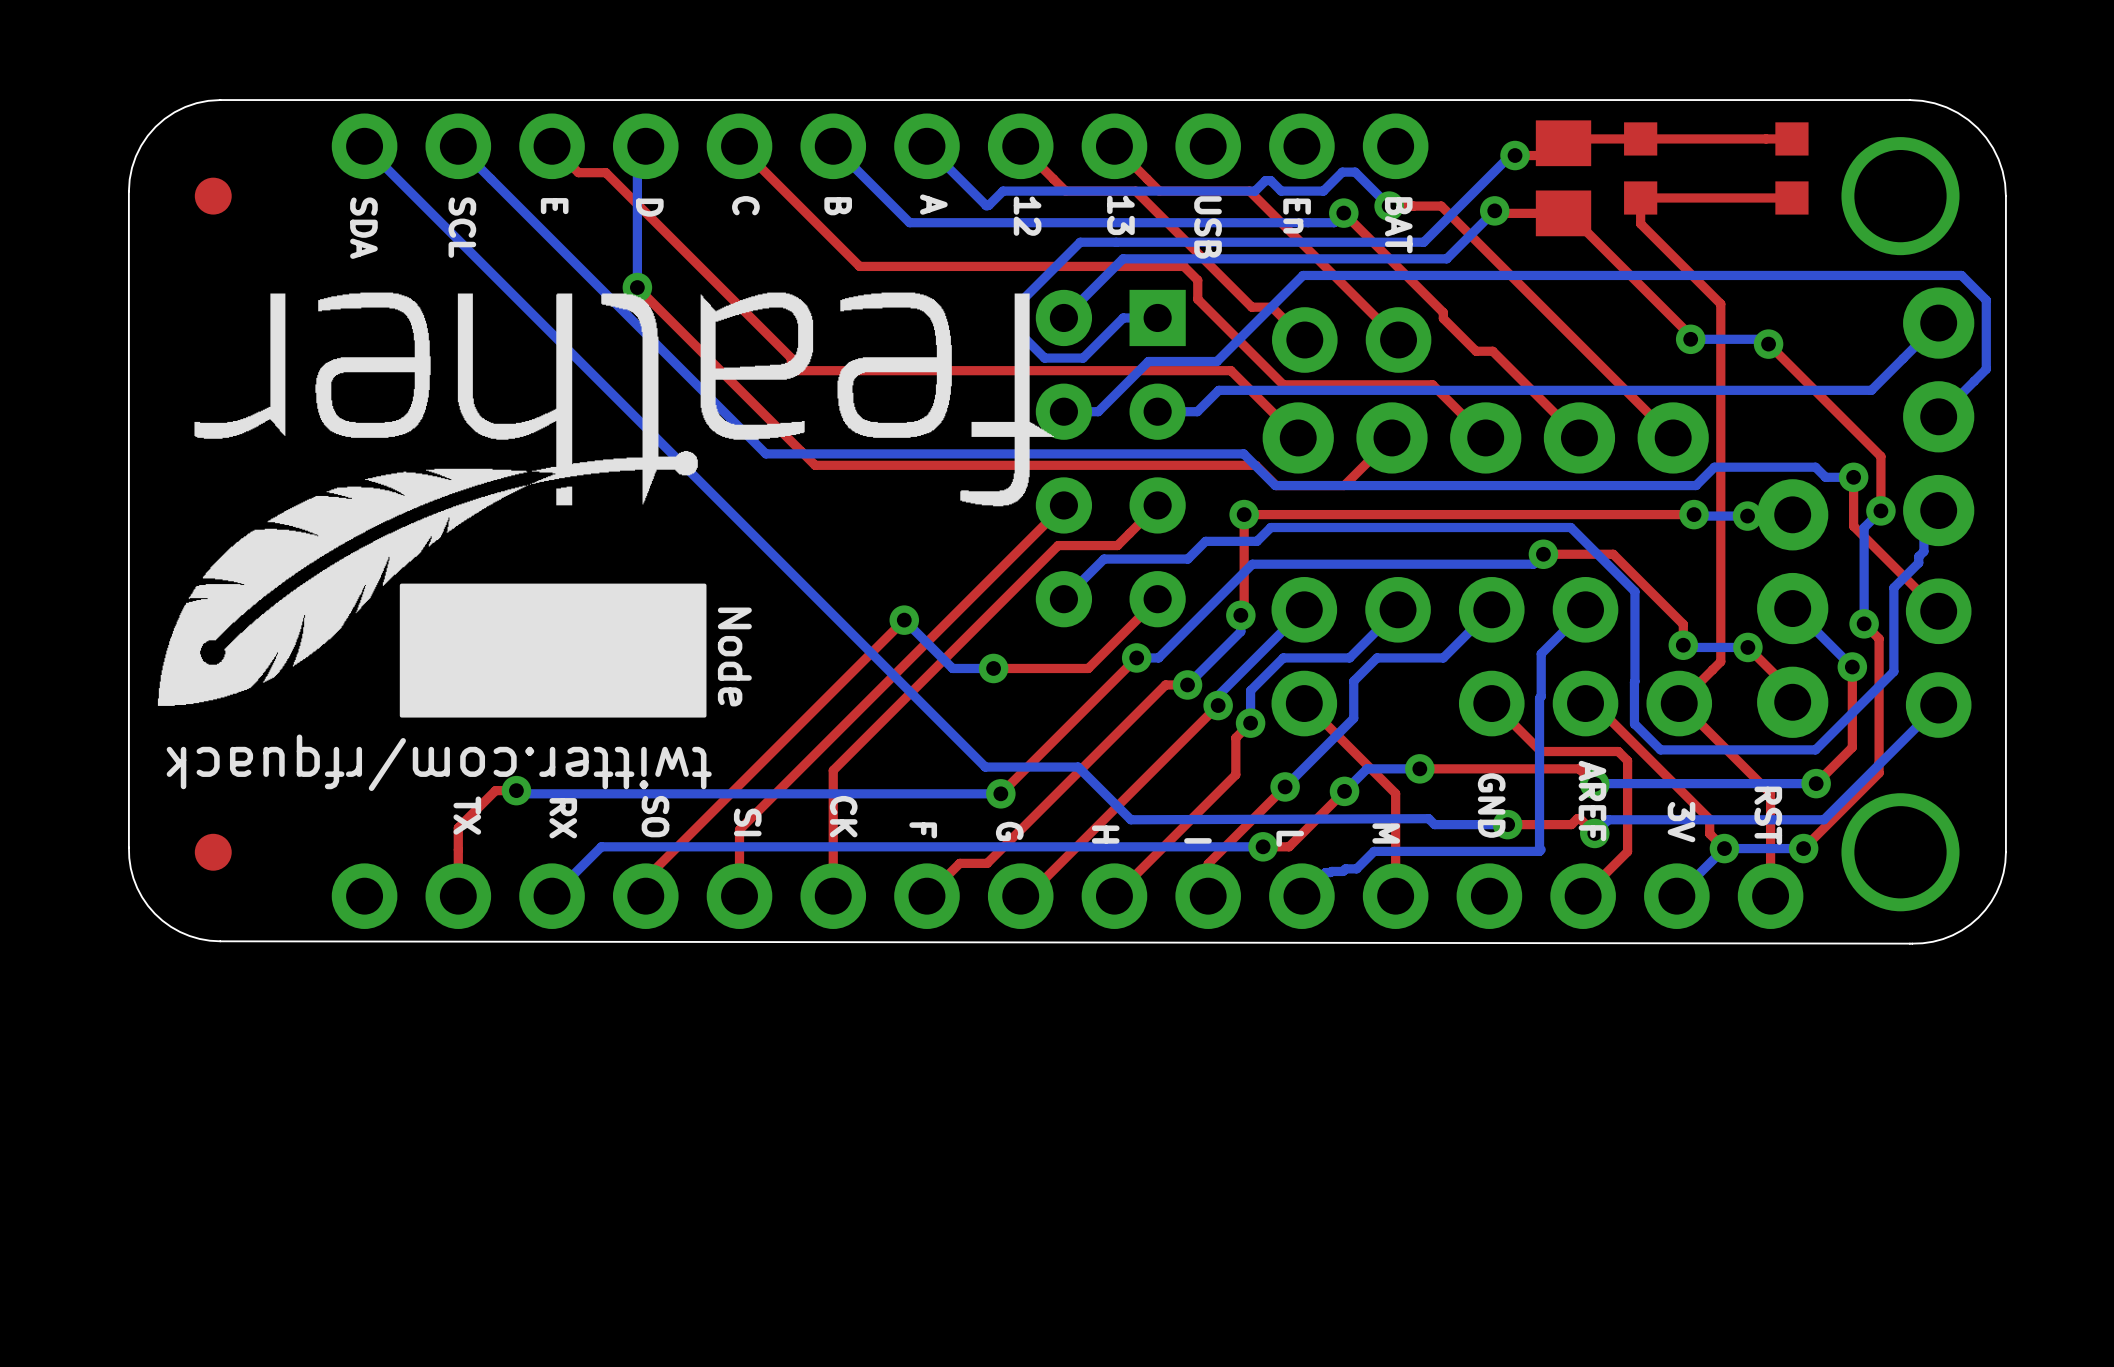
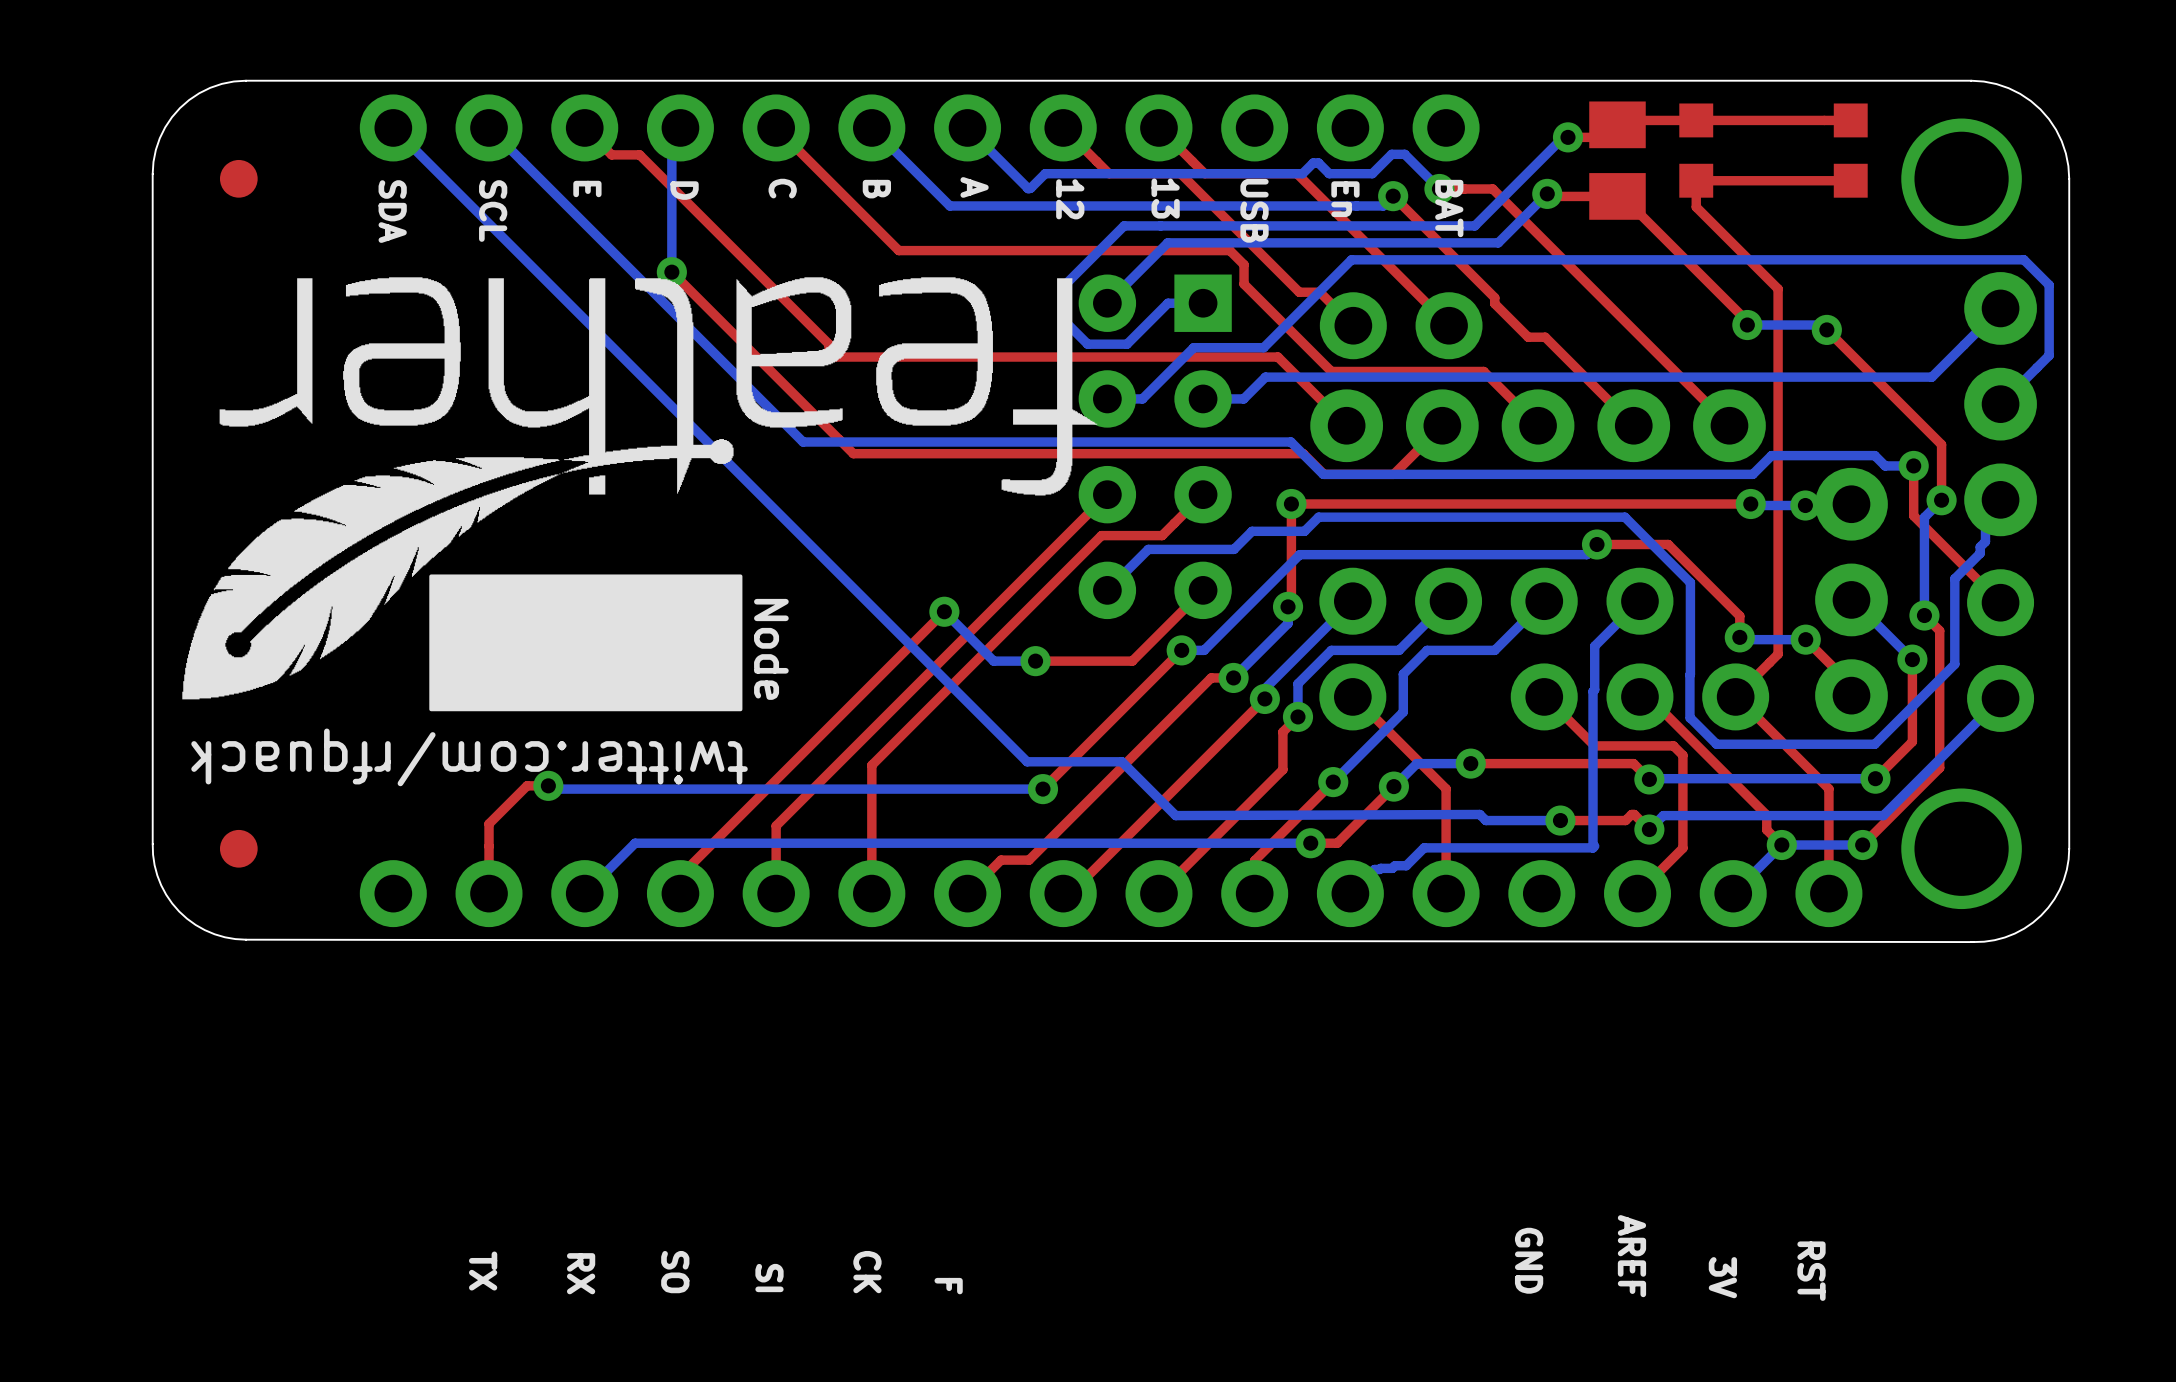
text position: AREF (1592, 801) -> AREF (1631, 1256)
text position: GND (1491, 805) -> GND (1529, 1260)
text position: TX (467, 815) -> TX (483, 1271)
text position: RST (1768, 815) -> RST (1811, 1271)
text position: SO (655, 816) -> SO (675, 1272)
text position: CK (843, 816) -> CK (867, 1272)
text position: RX (563, 818) -> RX (581, 1273)
text position: SI (747, 822) -> SI (769, 1278)
text position: 3V (1681, 822) -> 3V (1722, 1277)
text position: F (923, 830) -> F (948, 1286)
text: G (1009, 831) -> none
text: M (1386, 833) -> none
text: H (1105, 834) -> none
text: L (1290, 838) -> none
text: I (1197, 840) -> none

